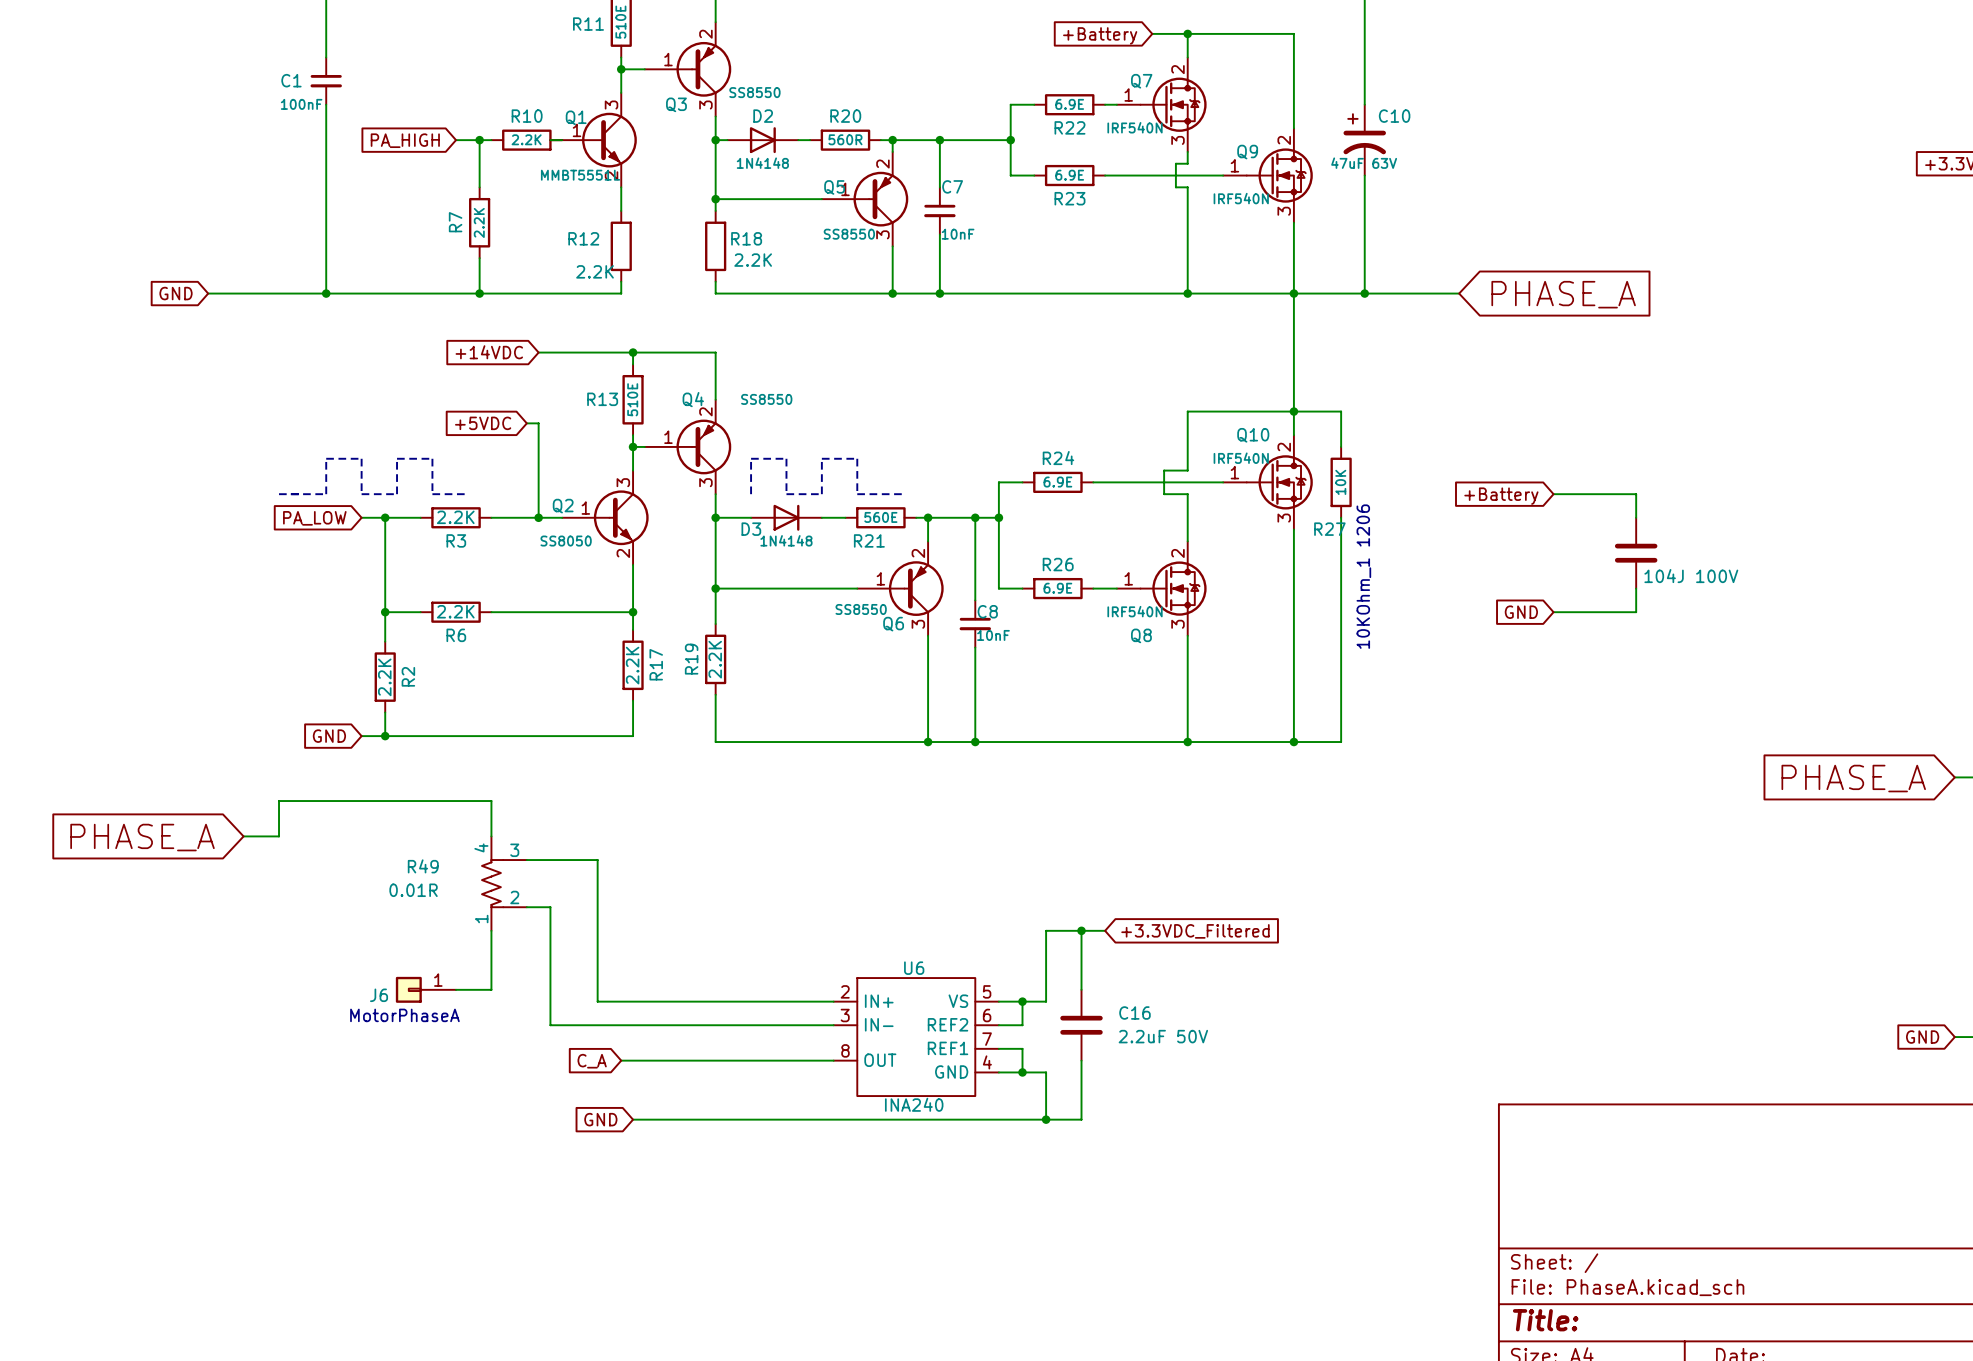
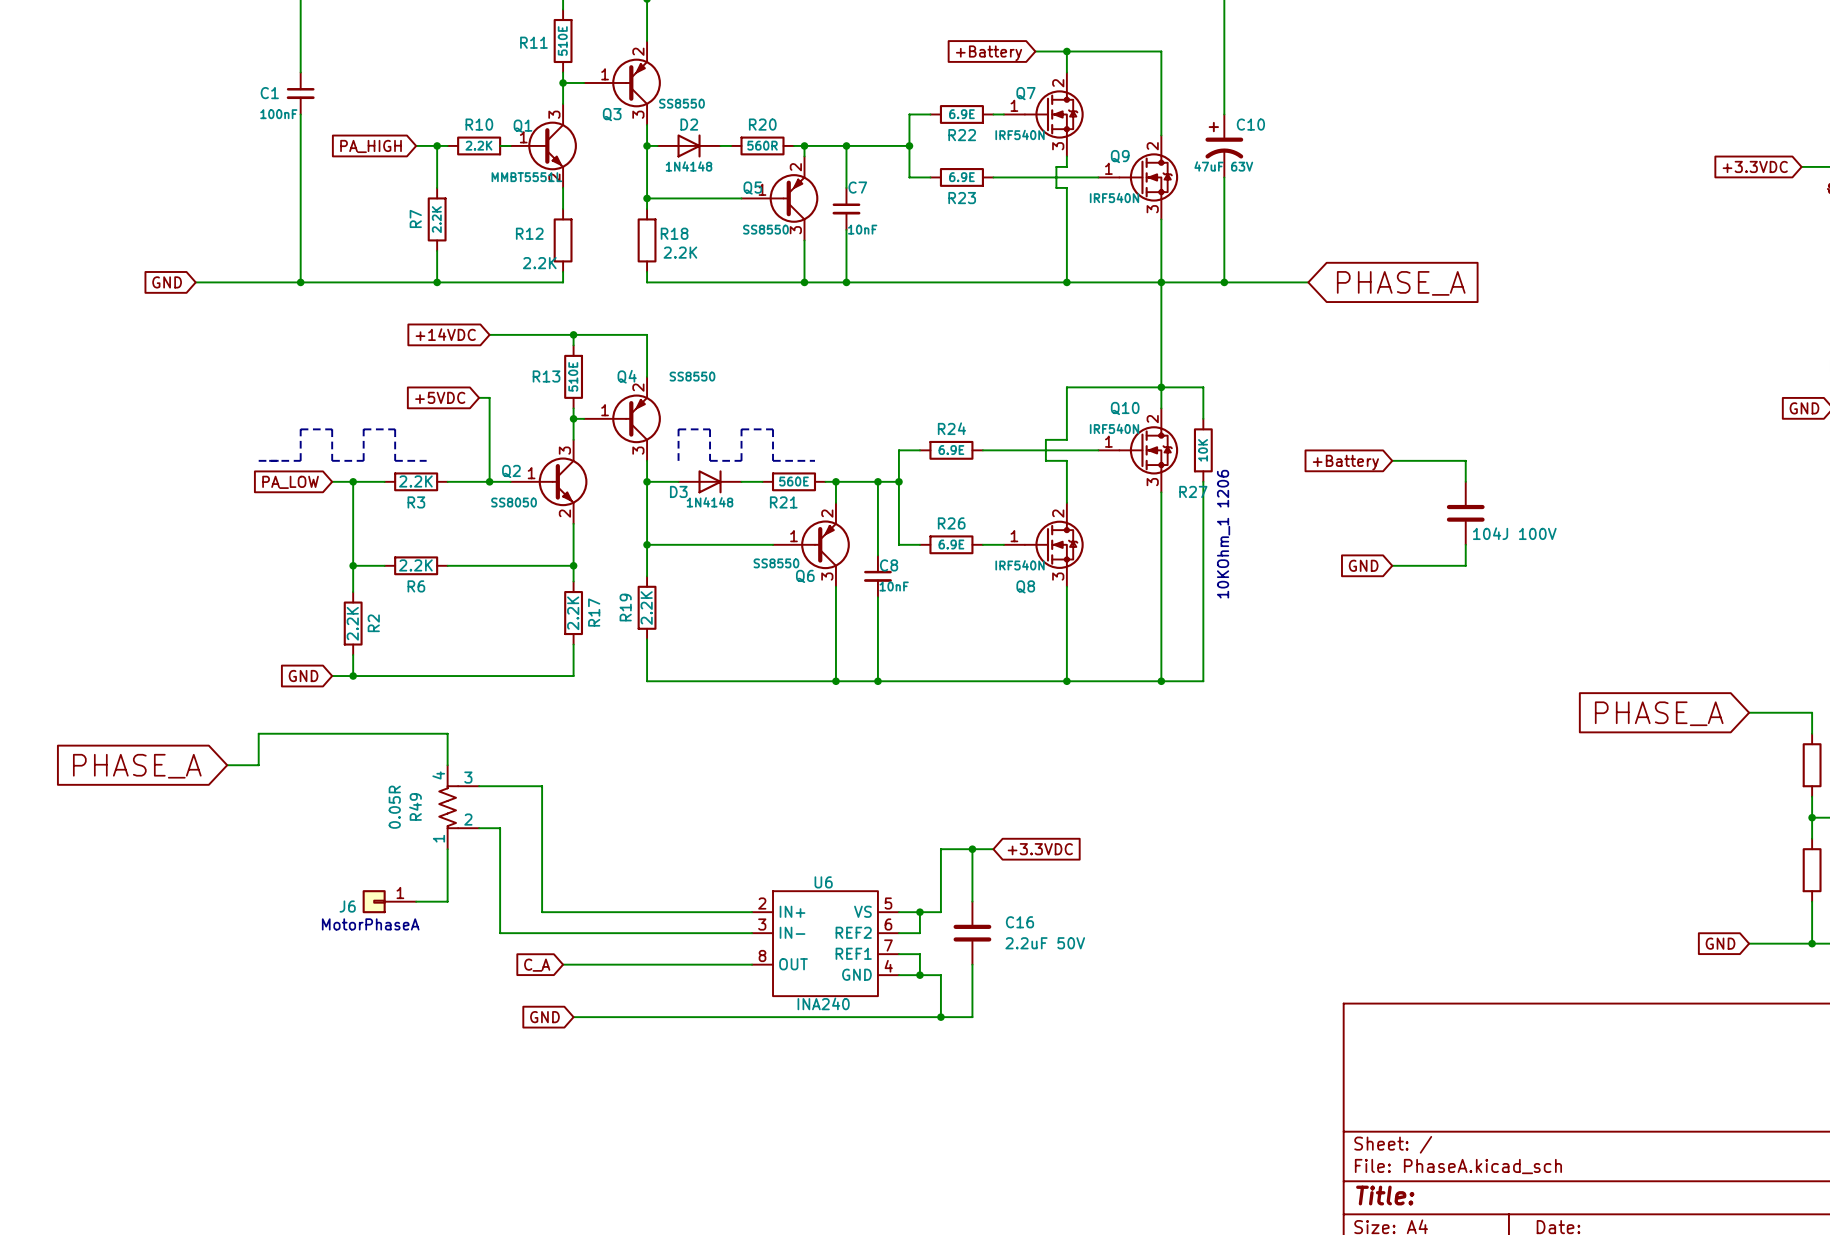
R49 name rotation: 0° (423, 866) -> 90° counterclockwise (415, 806)
R49 value: 0.01R (413, 890) -> 0.05R (394, 807)
global label: +3.3VDC_Filtered (1195, 931) -> +3.3VDC (1040, 849)

